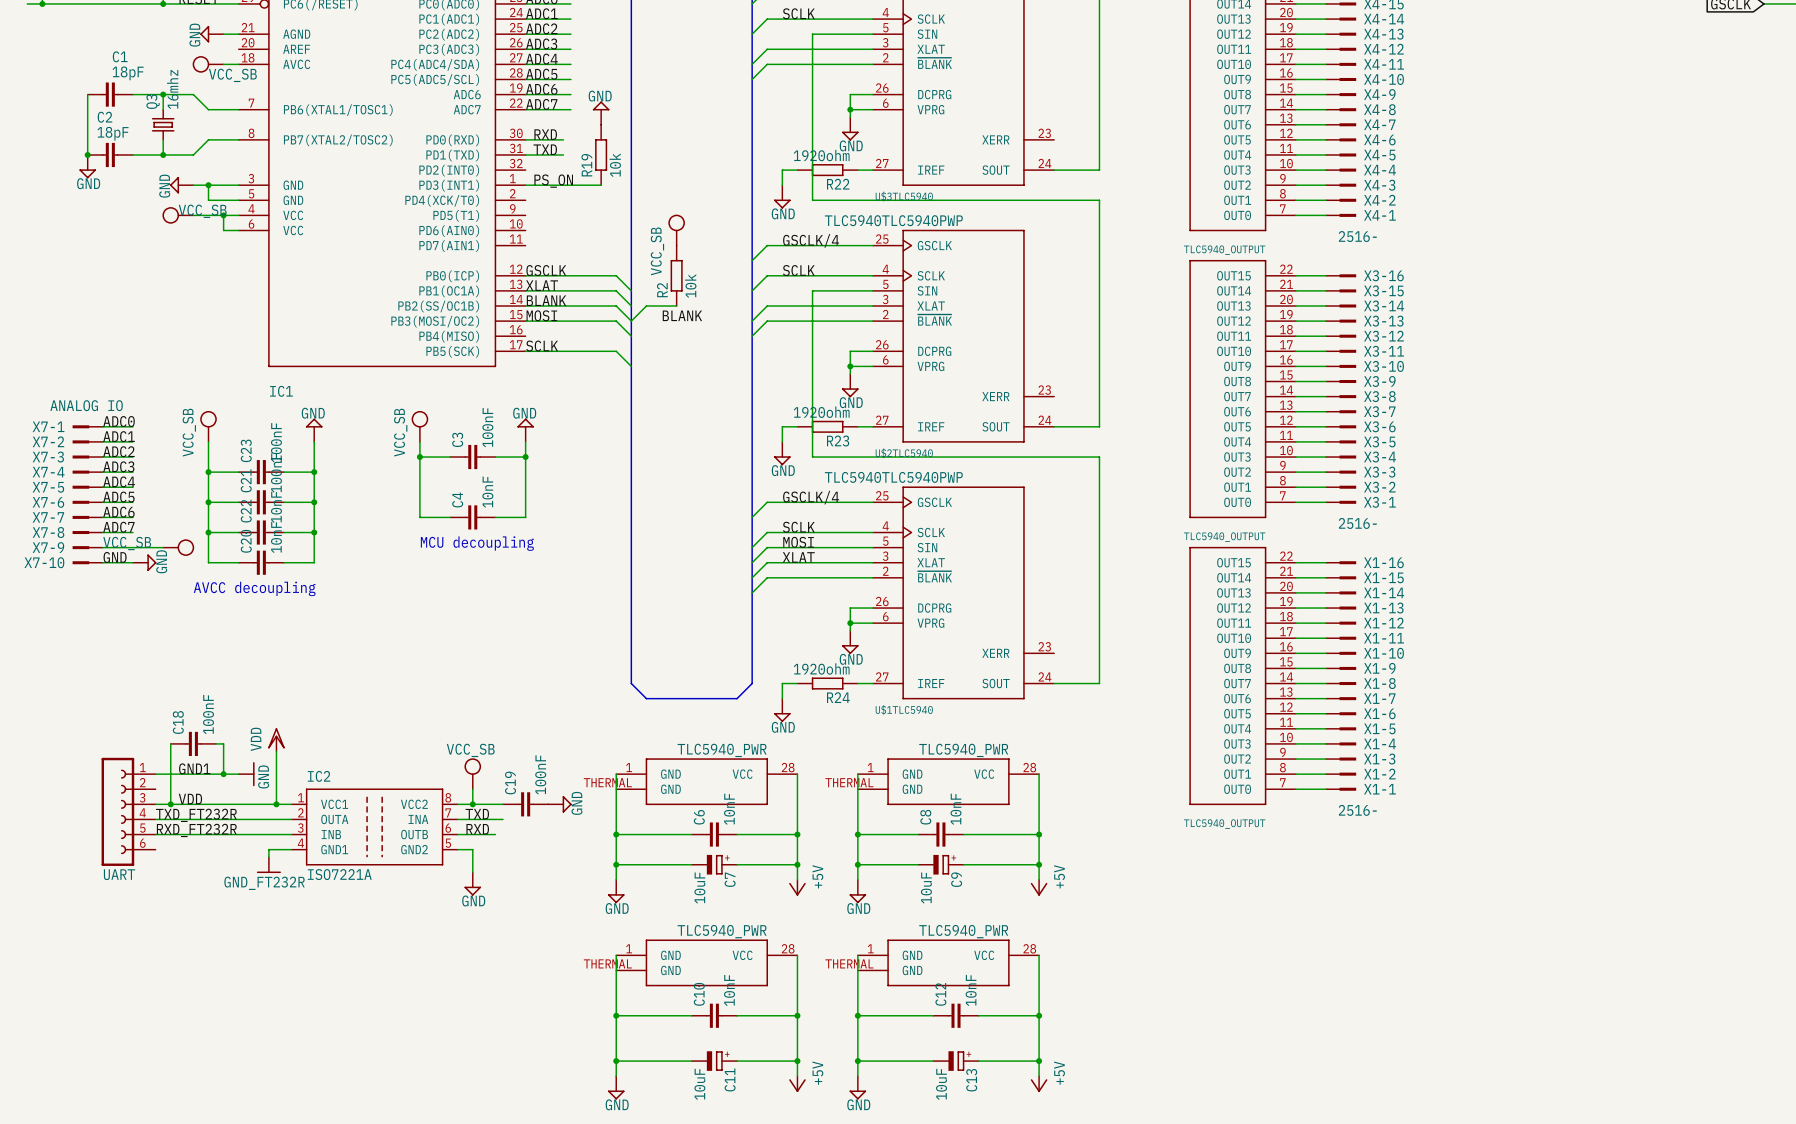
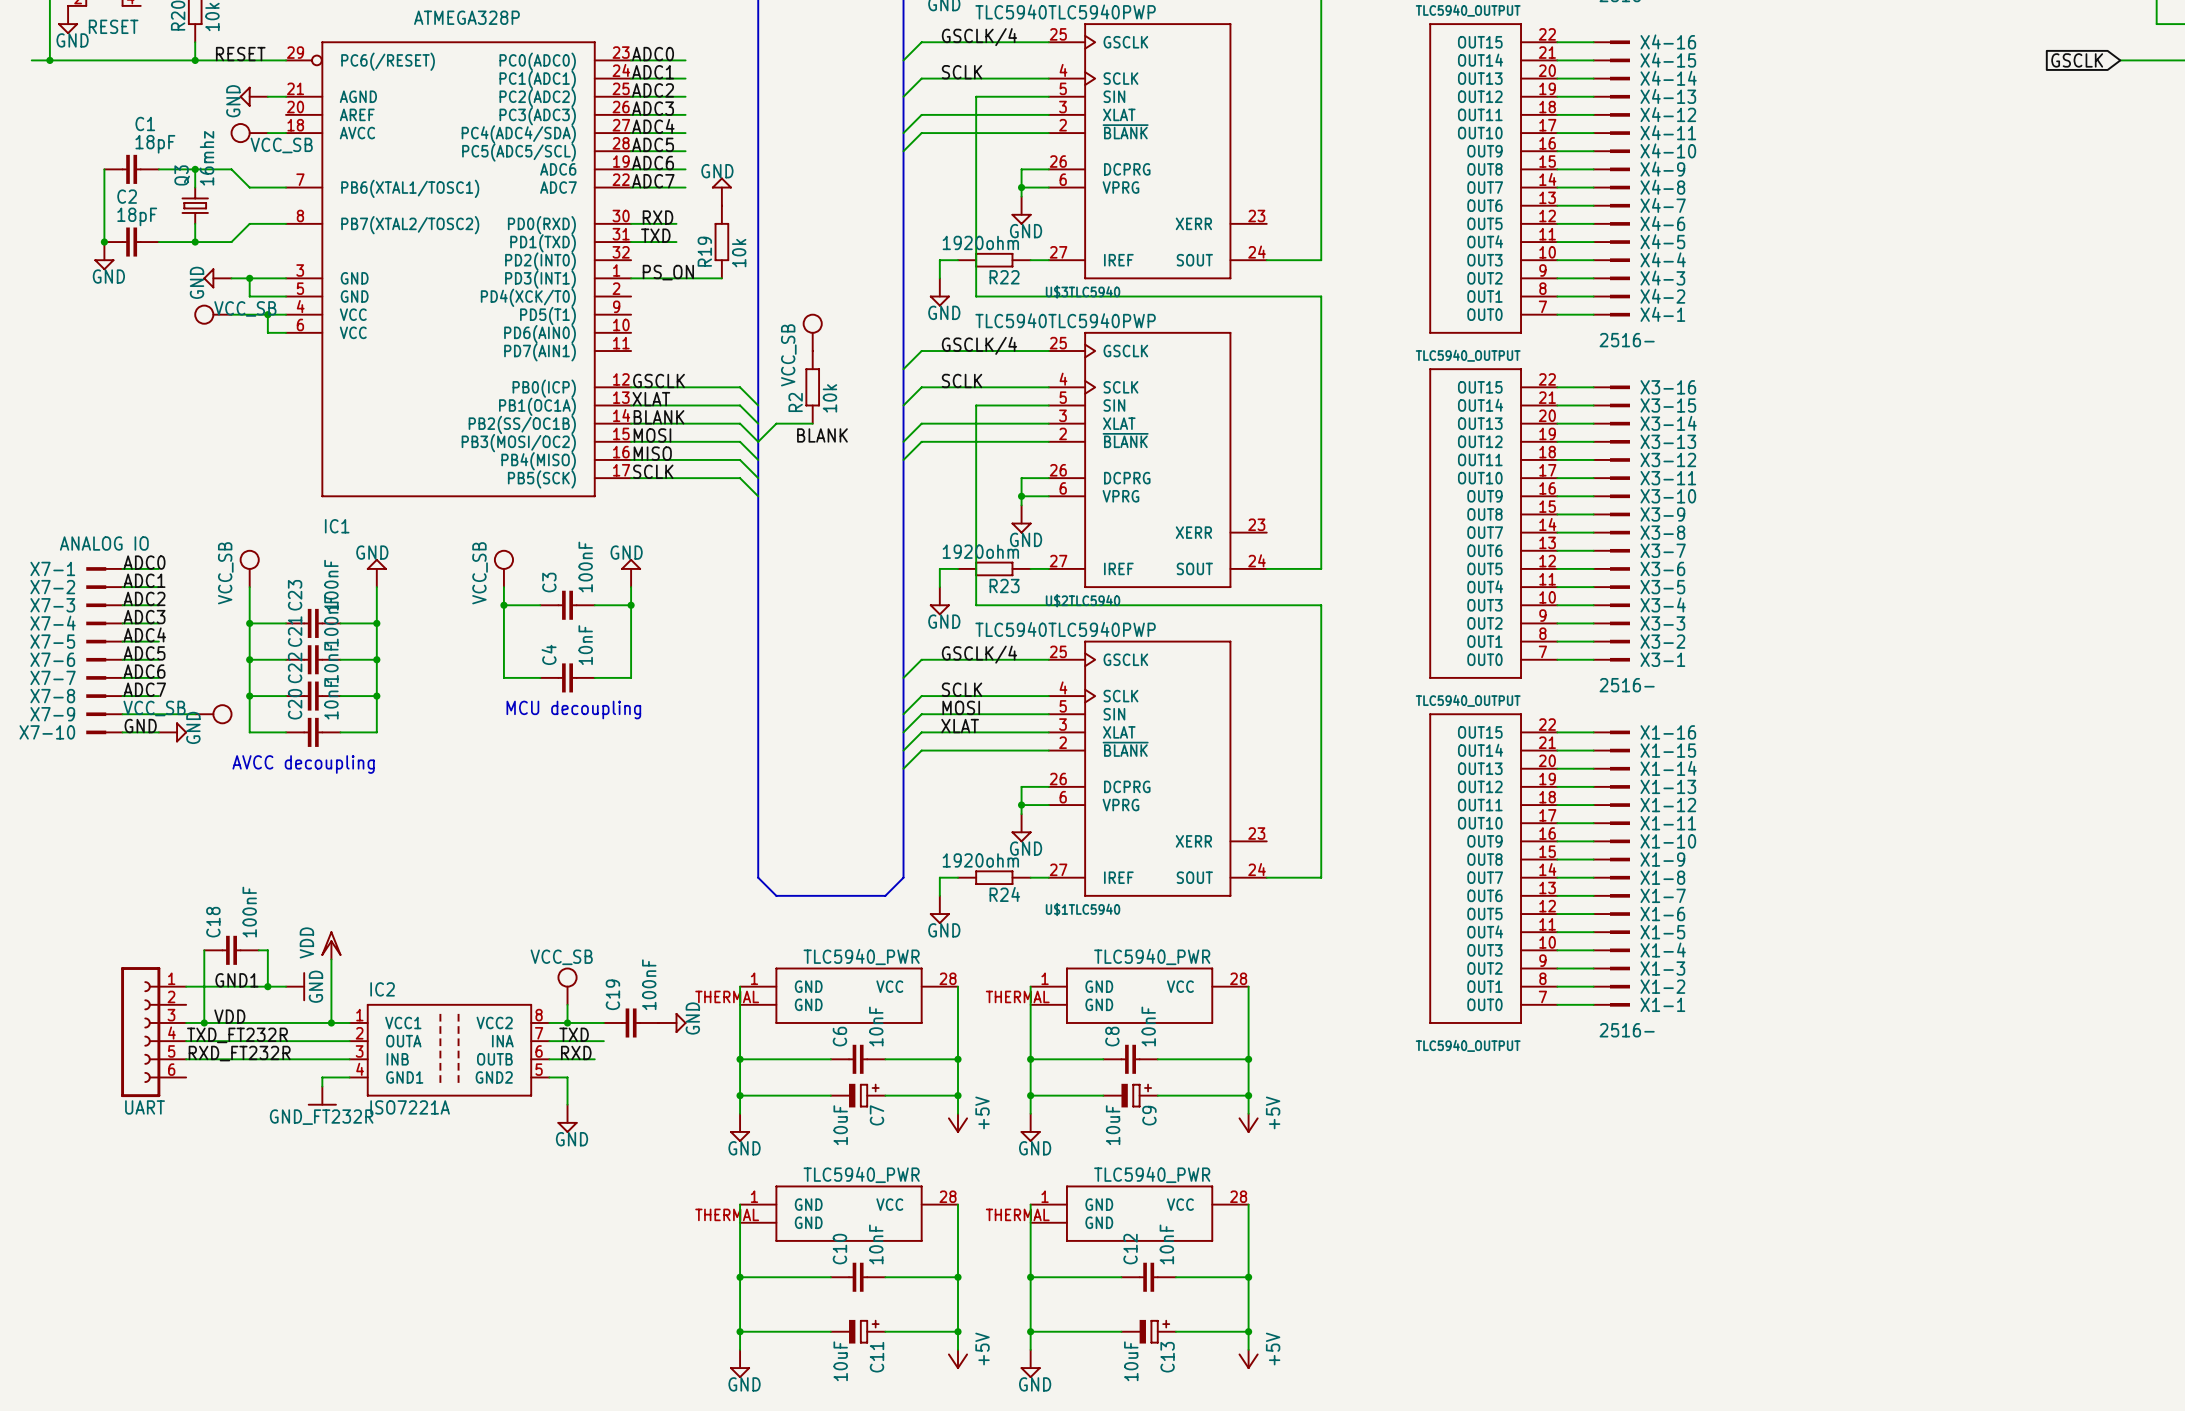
label: none -> MISO (652, 453)
wire: none -> (631, 459) (740, 459) (758, 478)

